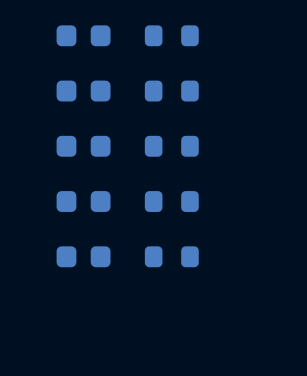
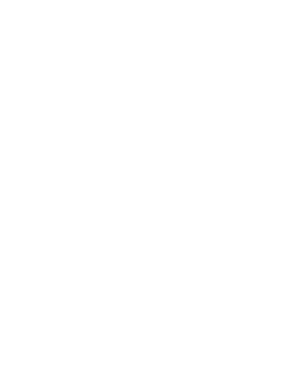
part: (83, 35) -> none
part: (171, 35) -> none
part: (83, 91) -> none
part: (171, 91) -> none
part: (83, 146) -> none
part: (171, 146) -> none
part: (83, 201) -> none
part: (171, 201) -> none
part: (83, 256) -> none
part: (171, 256) -> none

